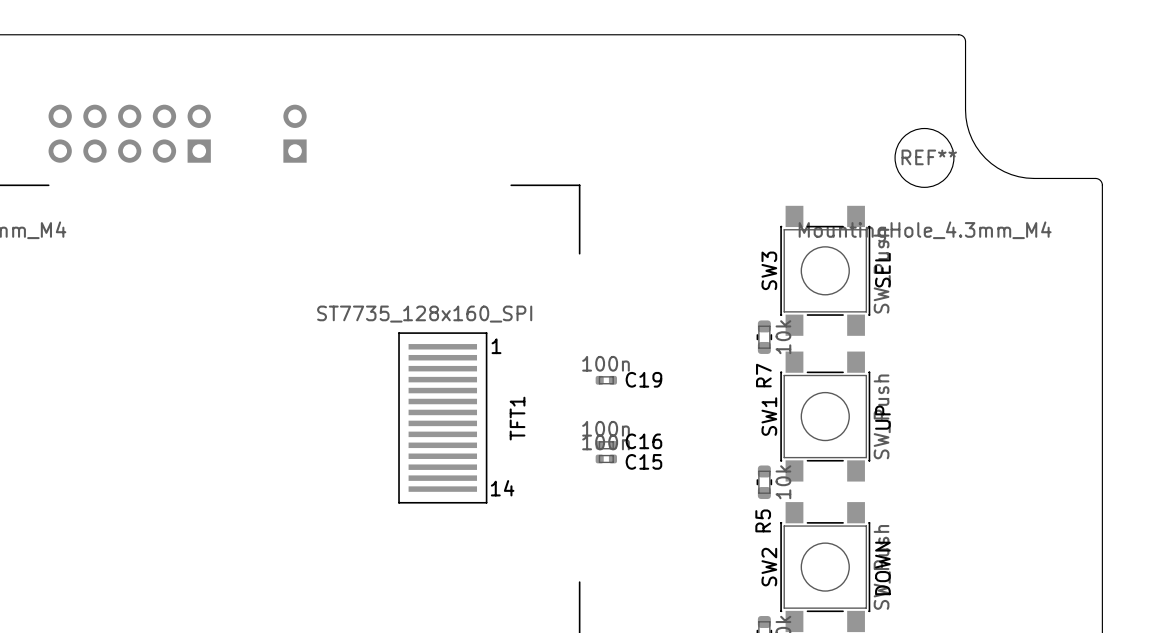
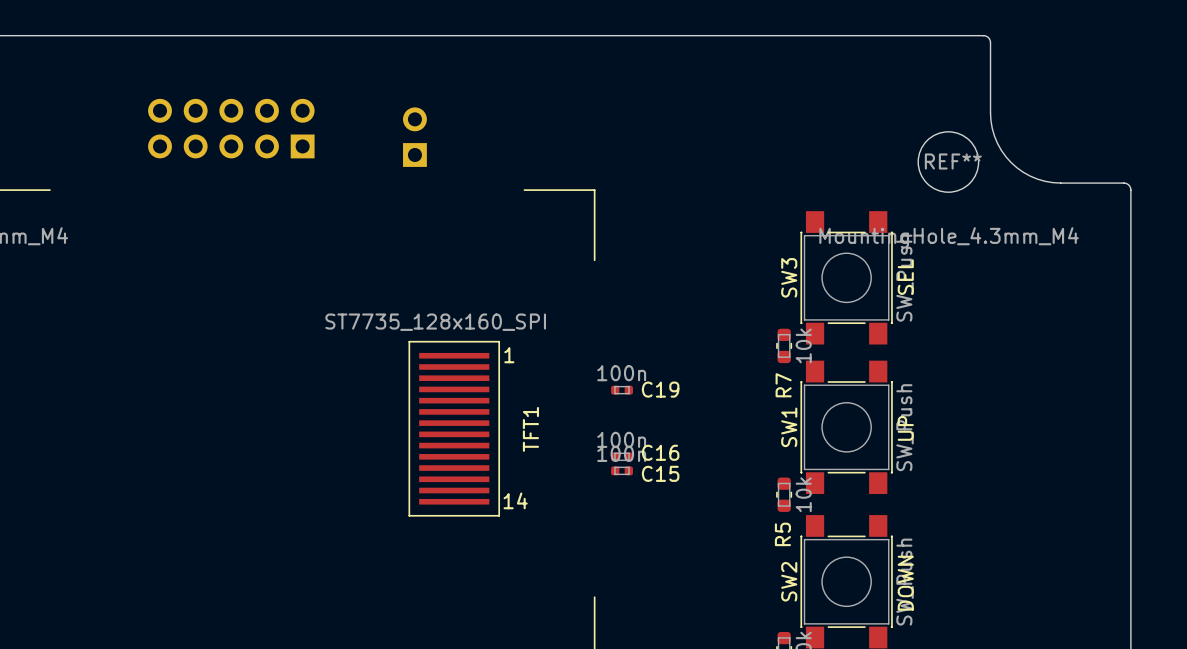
part position: (129, 133) -> (231, 128)
part position: (295, 133) -> (414, 137)

